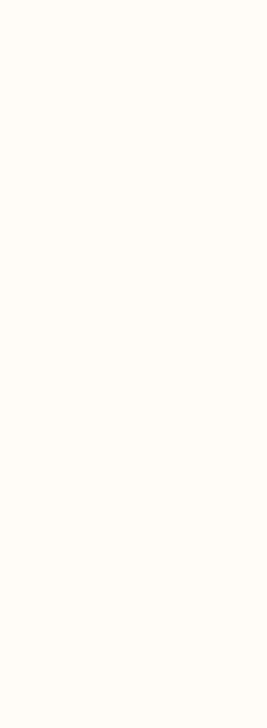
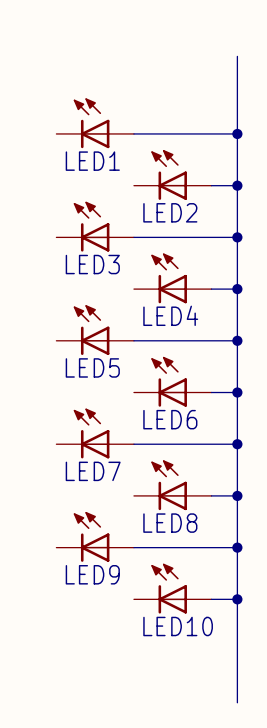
wire: none -> (237, 56) (237, 702)
LED1: none -> (95, 123)
wire: none -> (133, 133) (237, 133)
junction: none -> (237, 133)
LED2: none -> (172, 174)
wire: none -> (211, 185) (237, 185)
junction: none -> (237, 185)
LED3: none -> (95, 226)
wire: none -> (133, 237) (237, 237)
junction: none -> (237, 237)
LED4: none -> (172, 278)
wire: none -> (211, 289) (237, 289)
junction: none -> (237, 289)
LED5: none -> (95, 330)
wire: none -> (133, 340) (237, 340)
junction: none -> (237, 340)
LED6: none -> (172, 381)
wire: none -> (211, 392) (237, 392)
junction: none -> (237, 392)
LED7: none -> (95, 433)
wire: none -> (133, 444) (237, 444)
junction: none -> (237, 444)
LED8: none -> (172, 485)
wire: none -> (211, 495) (237, 495)
junction: none -> (237, 495)
LED9: none -> (95, 536)
wire: none -> (133, 547) (237, 547)
junction: none -> (237, 547)
LED10: none -> (172, 588)
wire: none -> (211, 599) (237, 599)
junction: none -> (237, 599)

